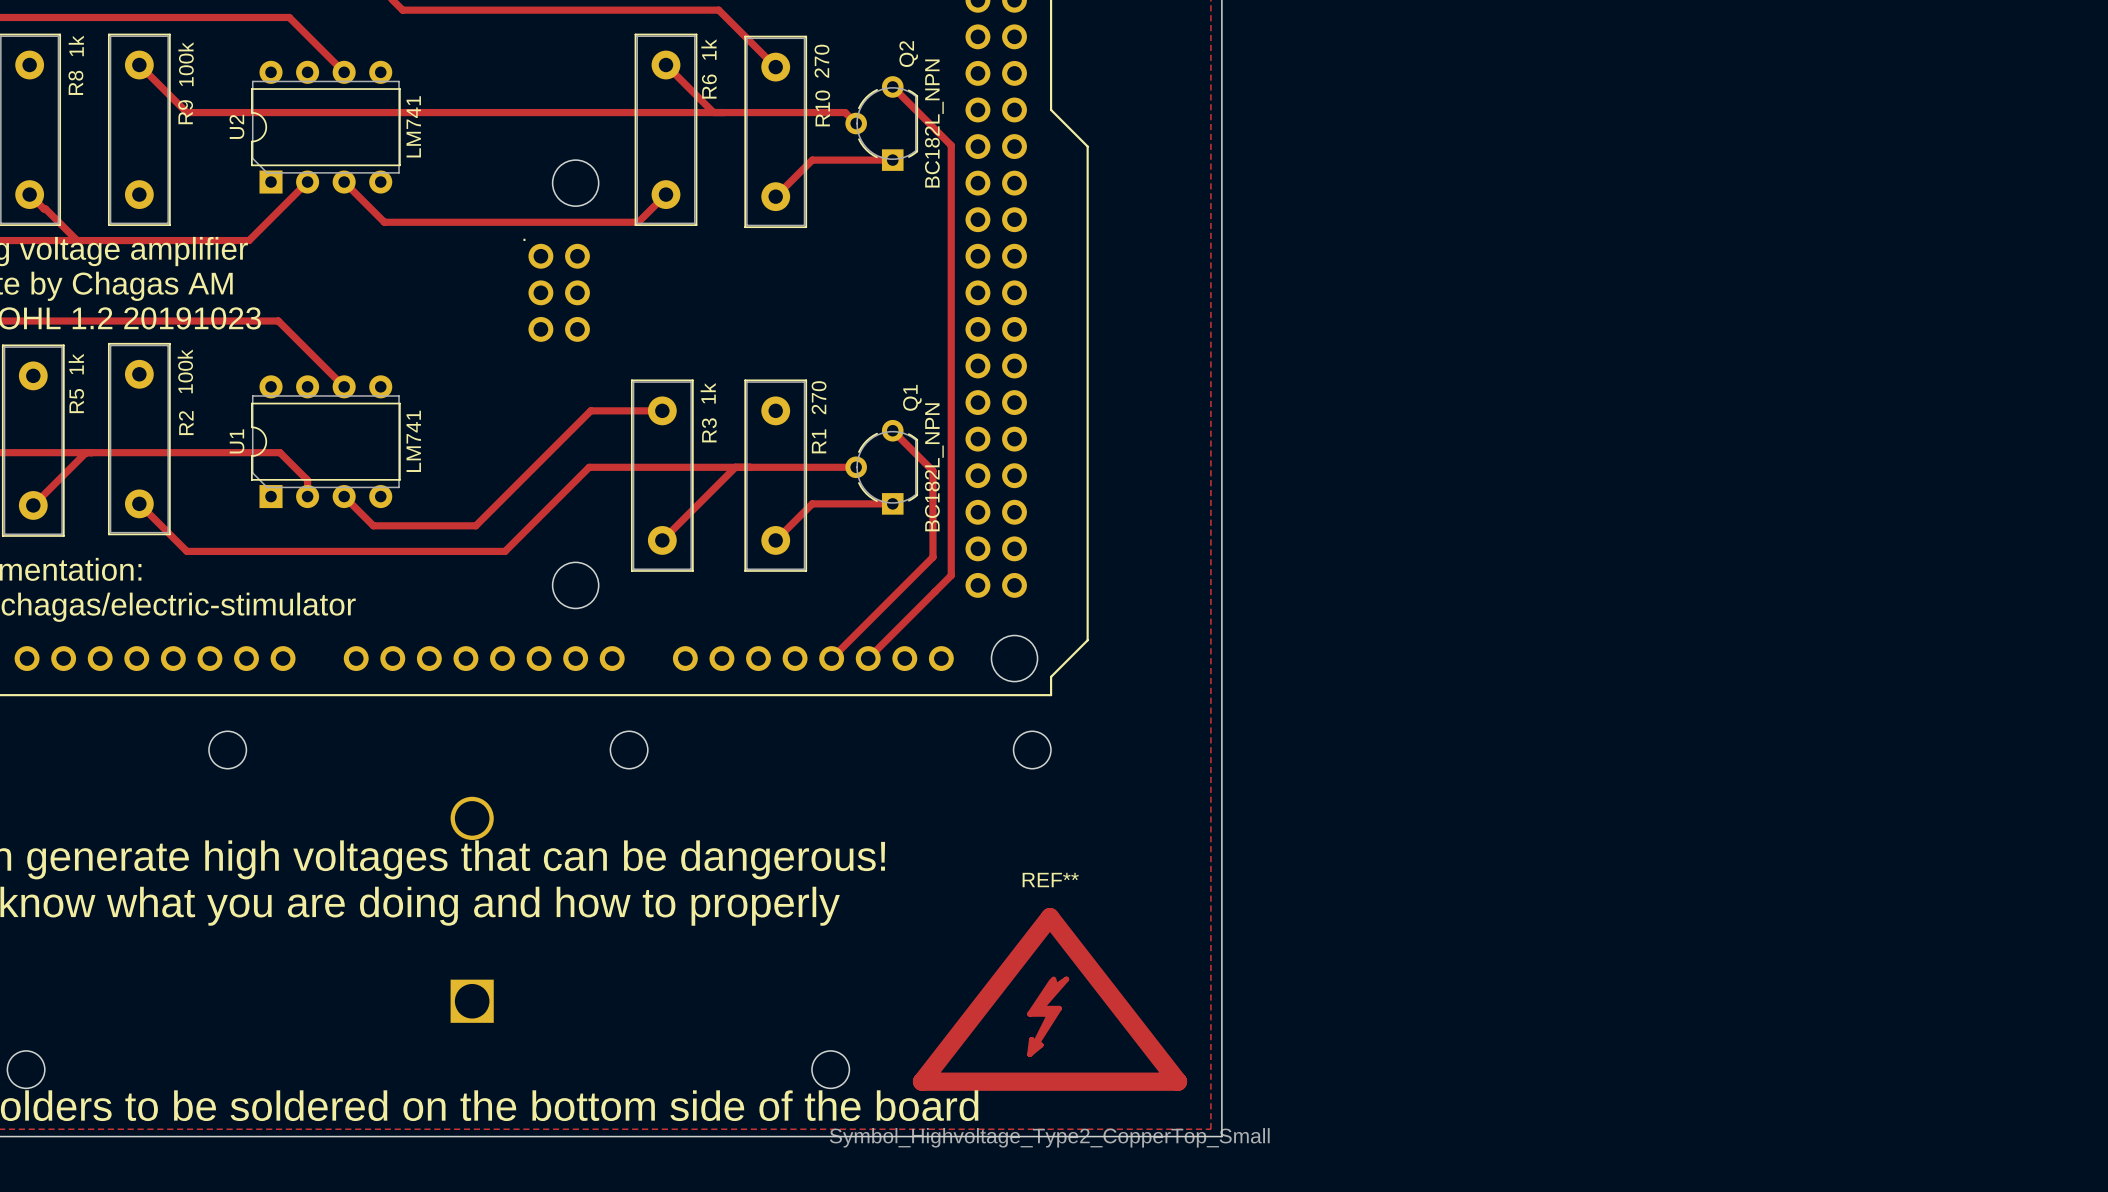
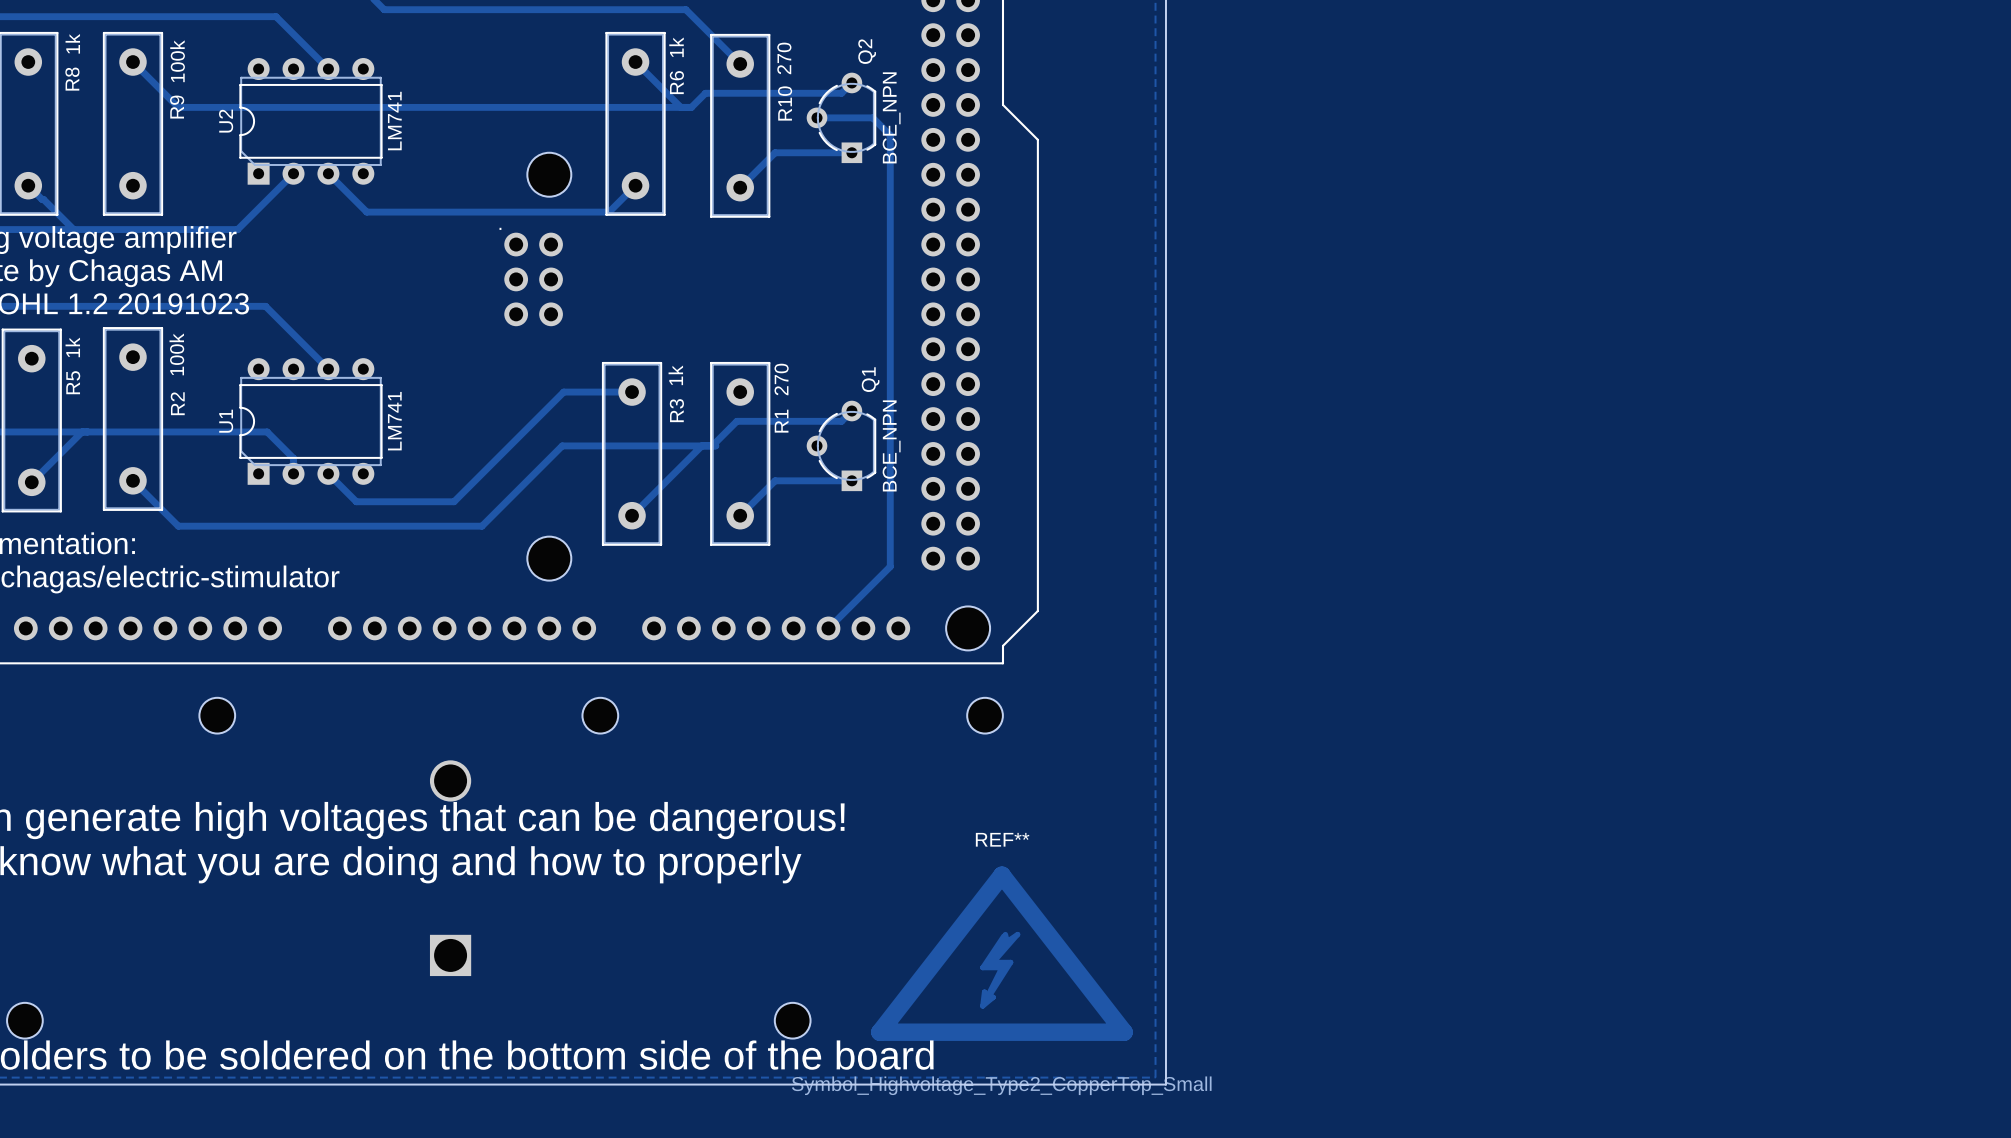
track: (892, 86) (951, 145) (951, 575) (932, 593) -> none
track: (724, 112) (845, 112) (856, 123) -> (691, 107) (705, 93) (841, 93) (851, 82)
track: none -> (817, 117) (872, 117) (890, 135) (890, 449)
Q2 value: BC182L_NPN (934, 123) -> BCE_NPN (891, 117)
track: (892, 430) (932, 470) -> (851, 411) (841, 421) (736, 421) (712, 445)
track: (750, 467) (856, 467) -> none
Q1 value: BC182L_NPN (934, 467) -> BCE_NPN (891, 445)
track: (932, 557) (831, 658) -> (890, 531) (890, 566)

